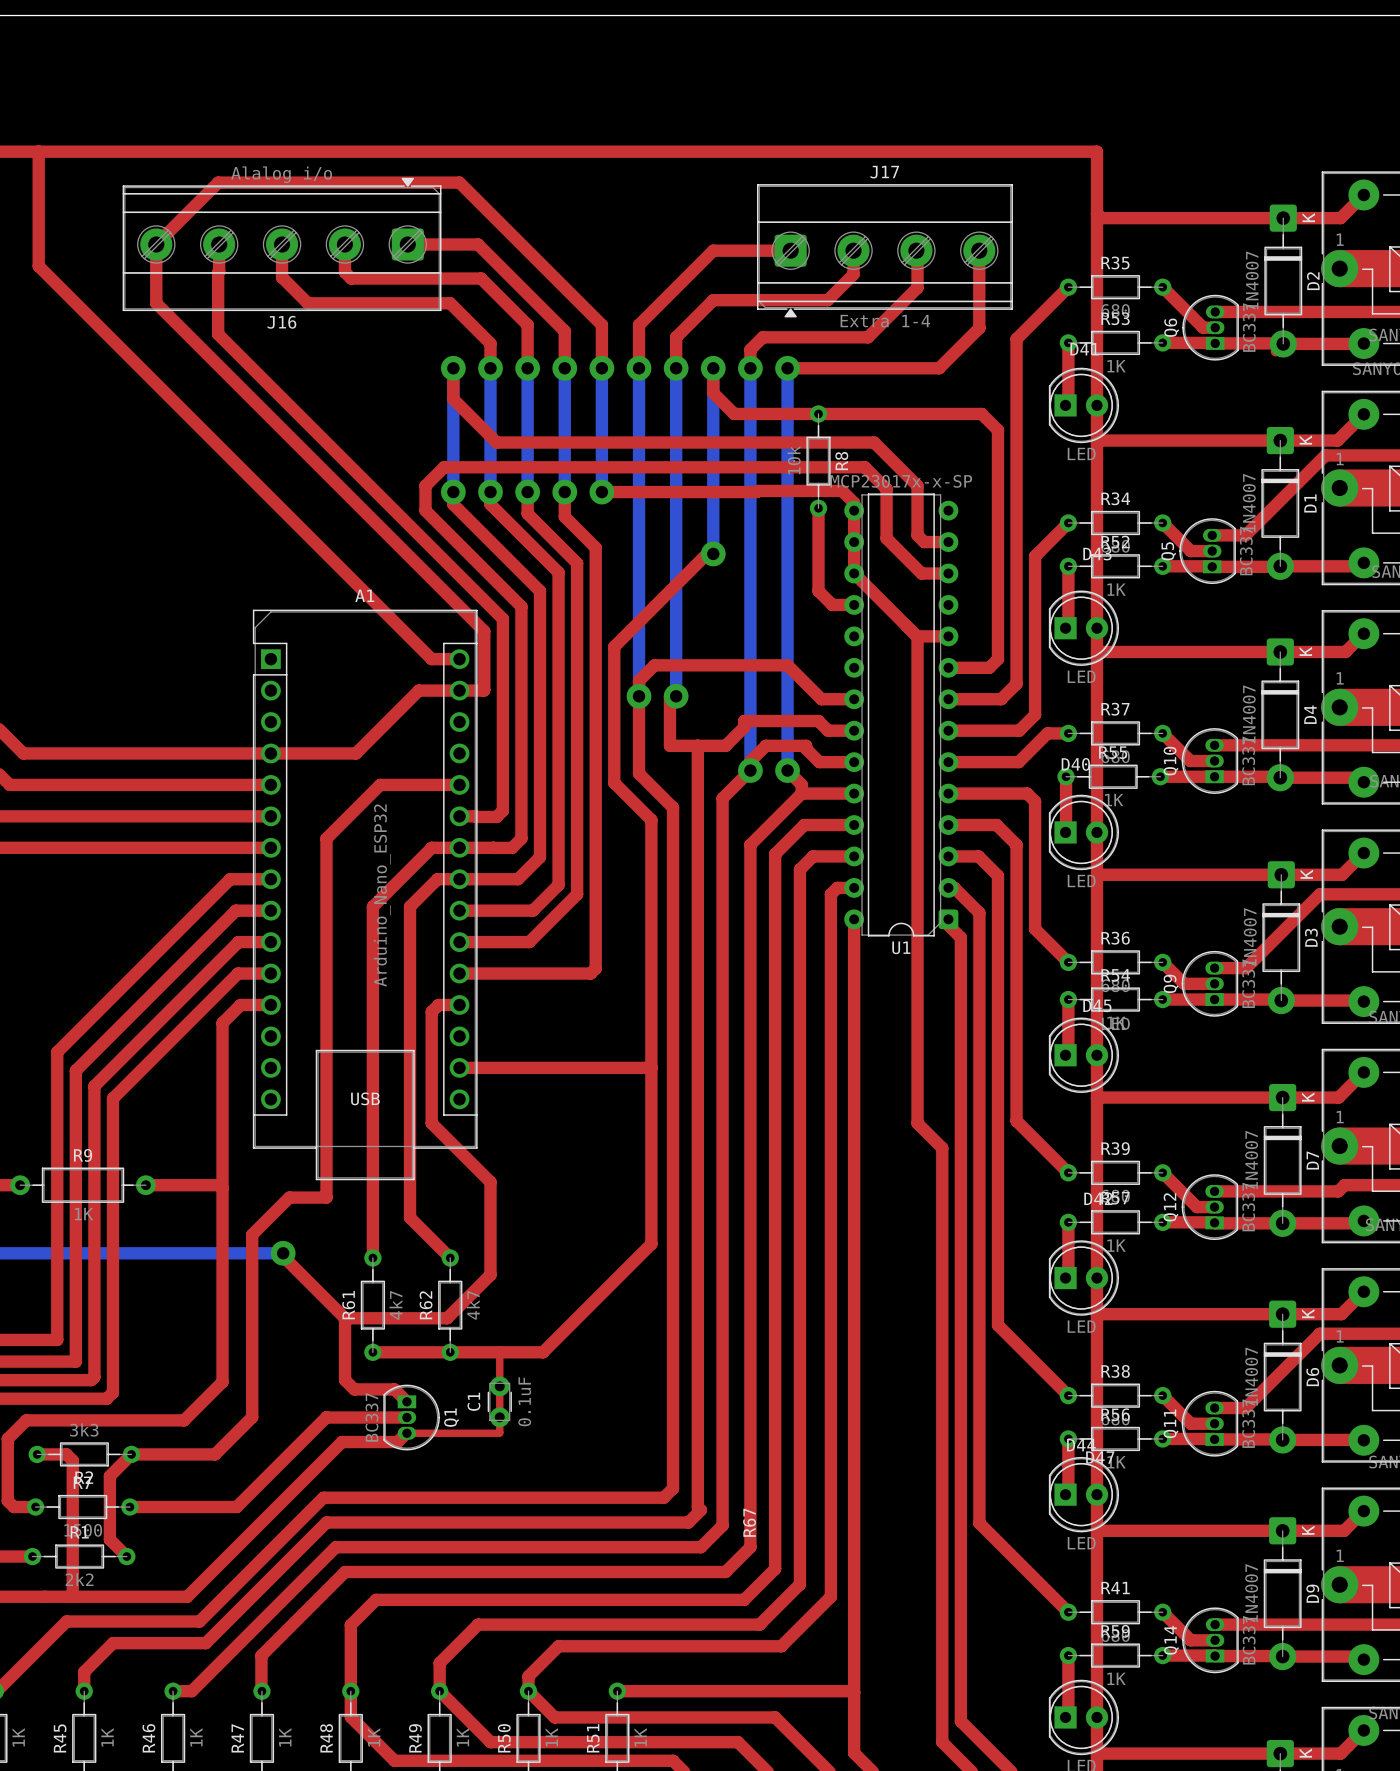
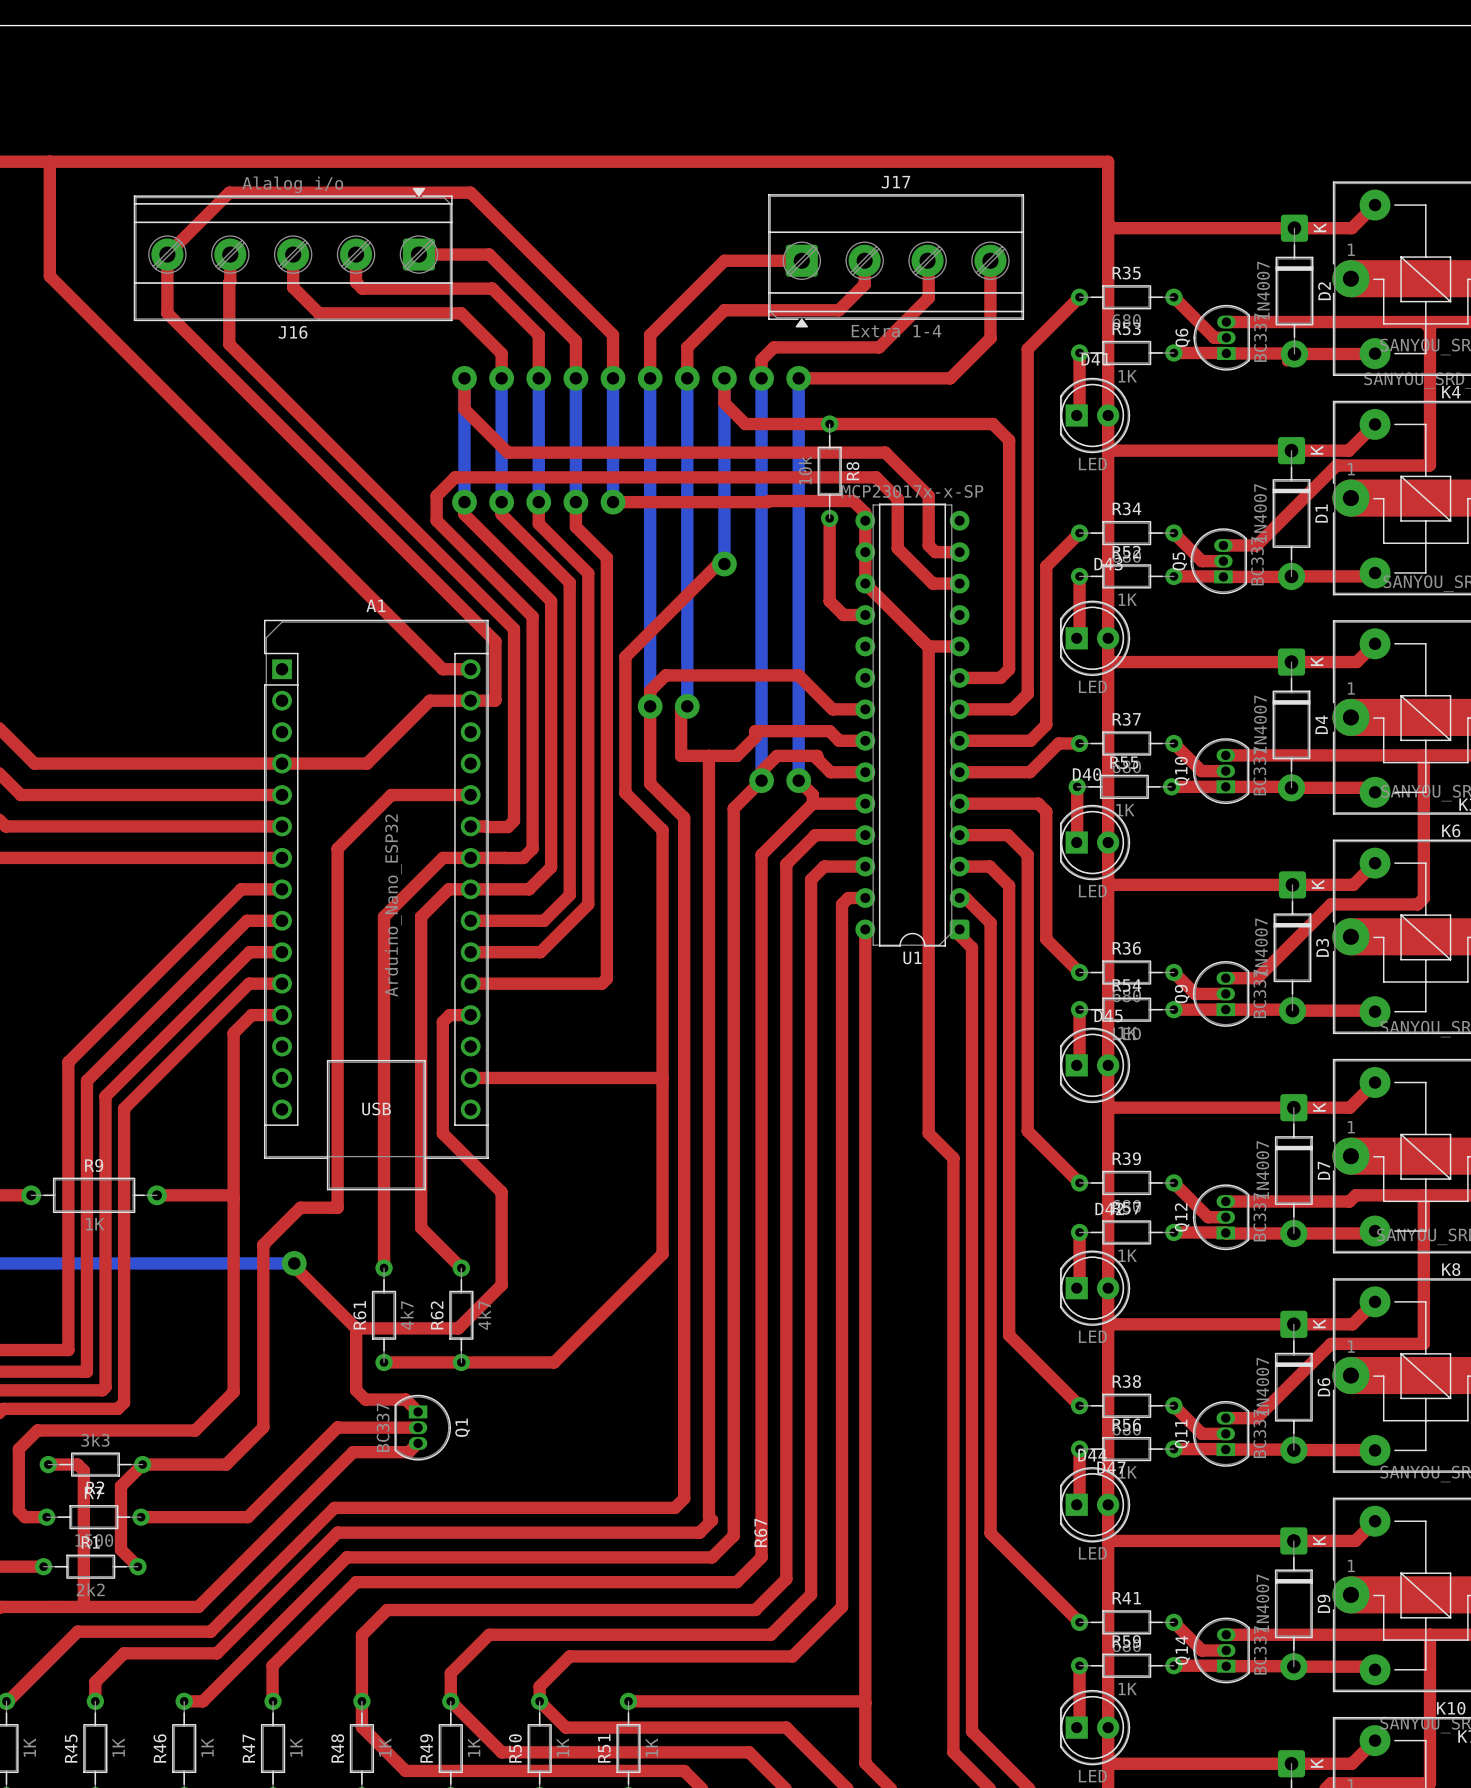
top track: (499, 1352) (499, 1411) -> none
C1: 0.1uF (499, 1401) -> none
top track: (499, 1423) (499, 1433) (406, 1433) -> none

